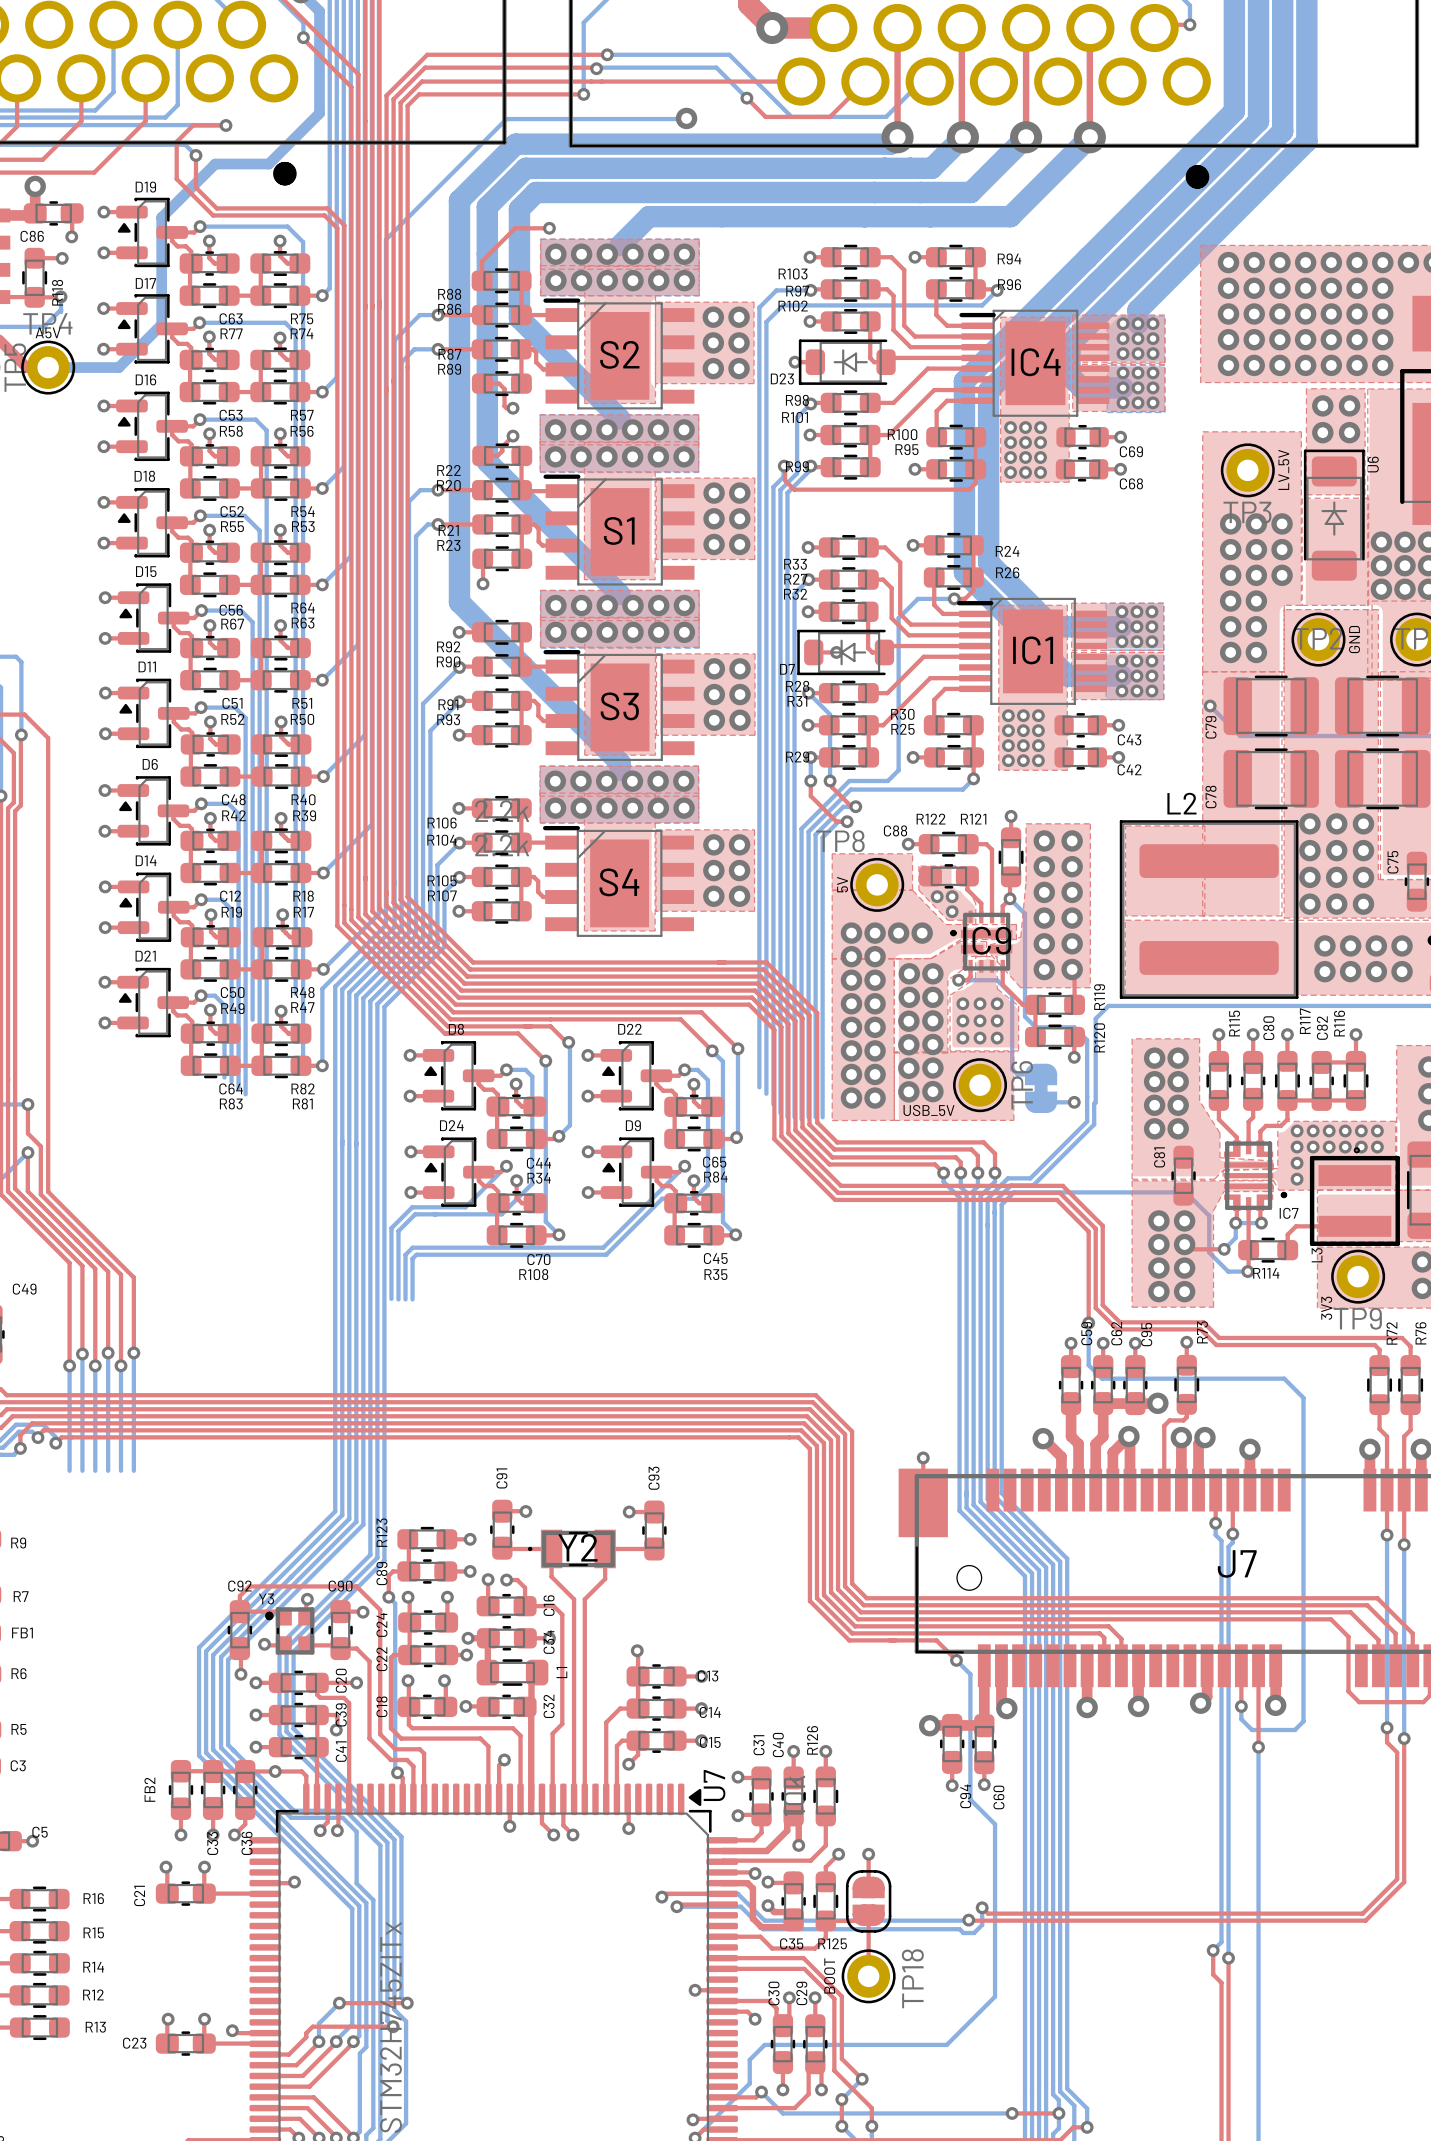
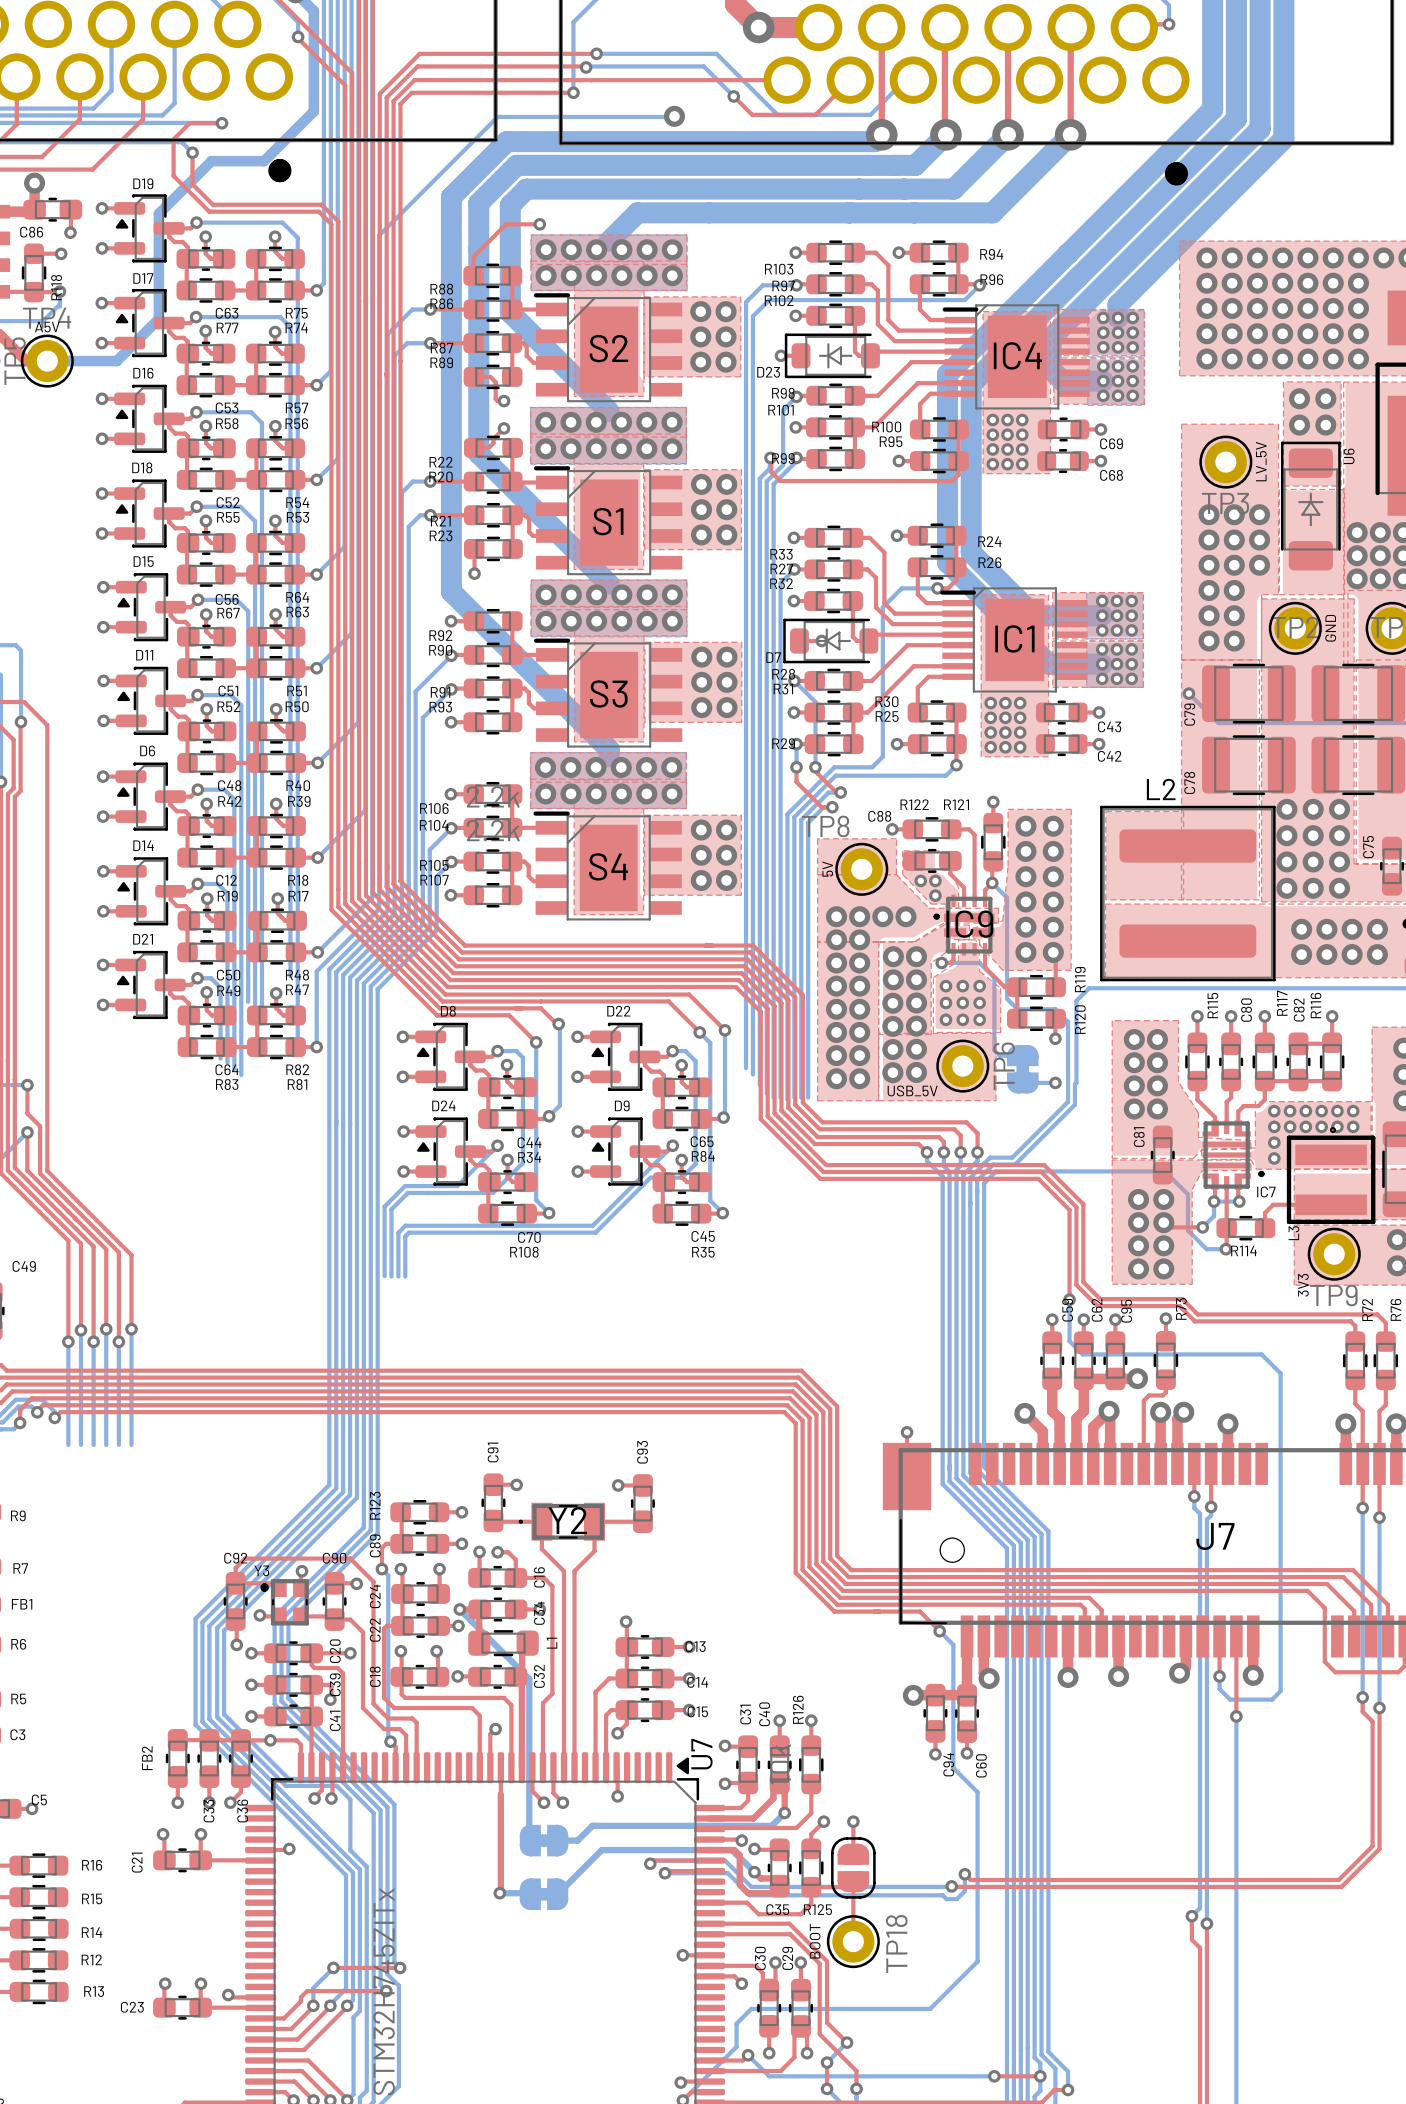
bottom track: none -> (459, 1609) (529, 1678) (530, 1840)
top track: none -> (500, 1794) (499, 1893)
via position: (509, 1826) -> (499, 1893)
bottom track: none -> (784, 1812) (771, 1825) (592, 1825) (577, 1840) (557, 1840)
part: none -> (544, 1840)
bottom track: none -> (754, 1872) (731, 1850) (601, 1850) (557, 1894)
bottom track: none -> (499, 1893) (530, 1894)
part: none -> (544, 1894)

